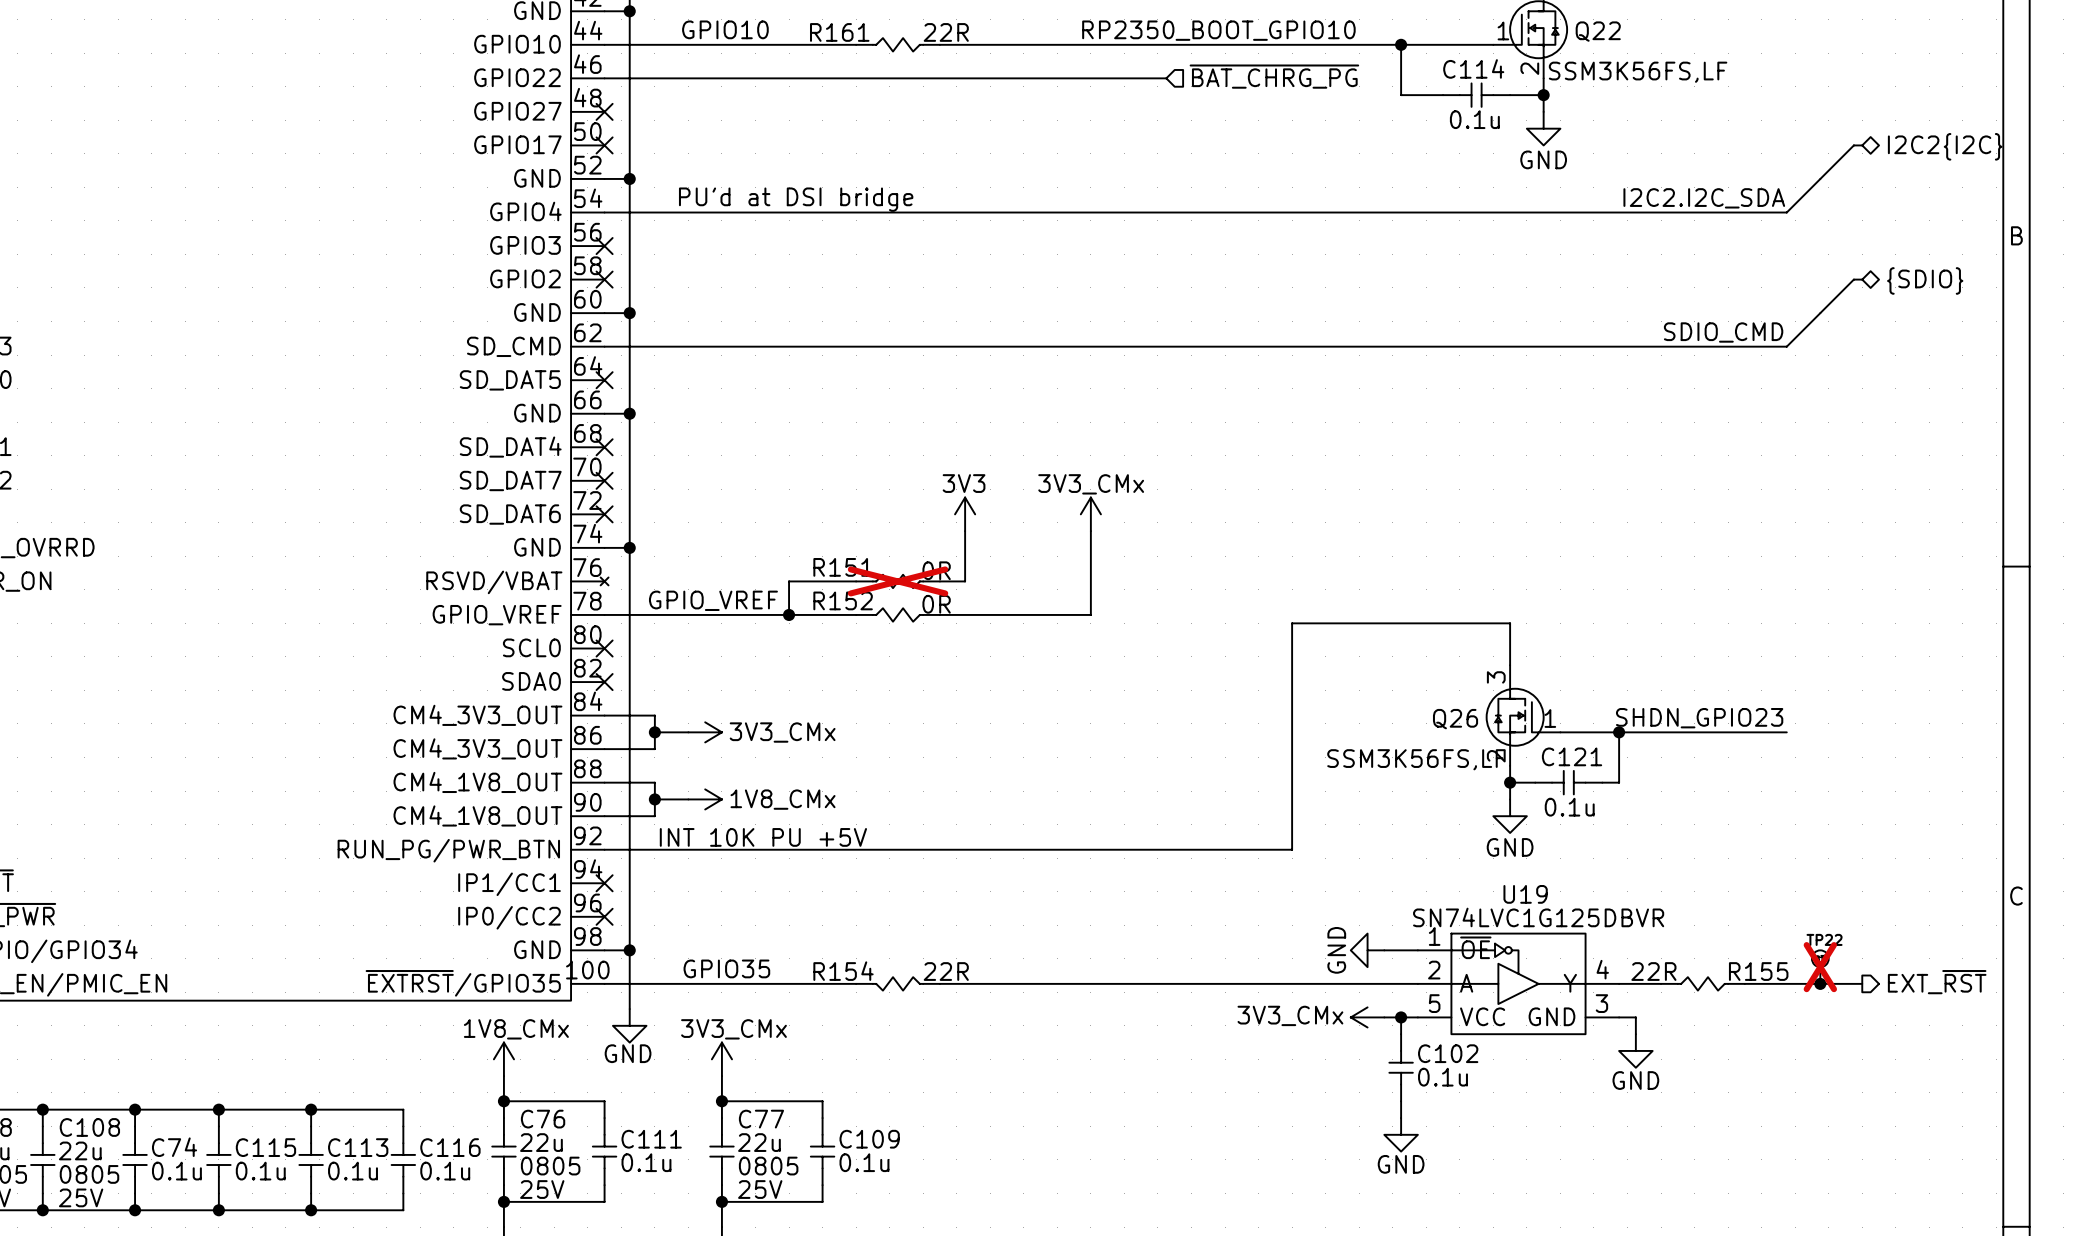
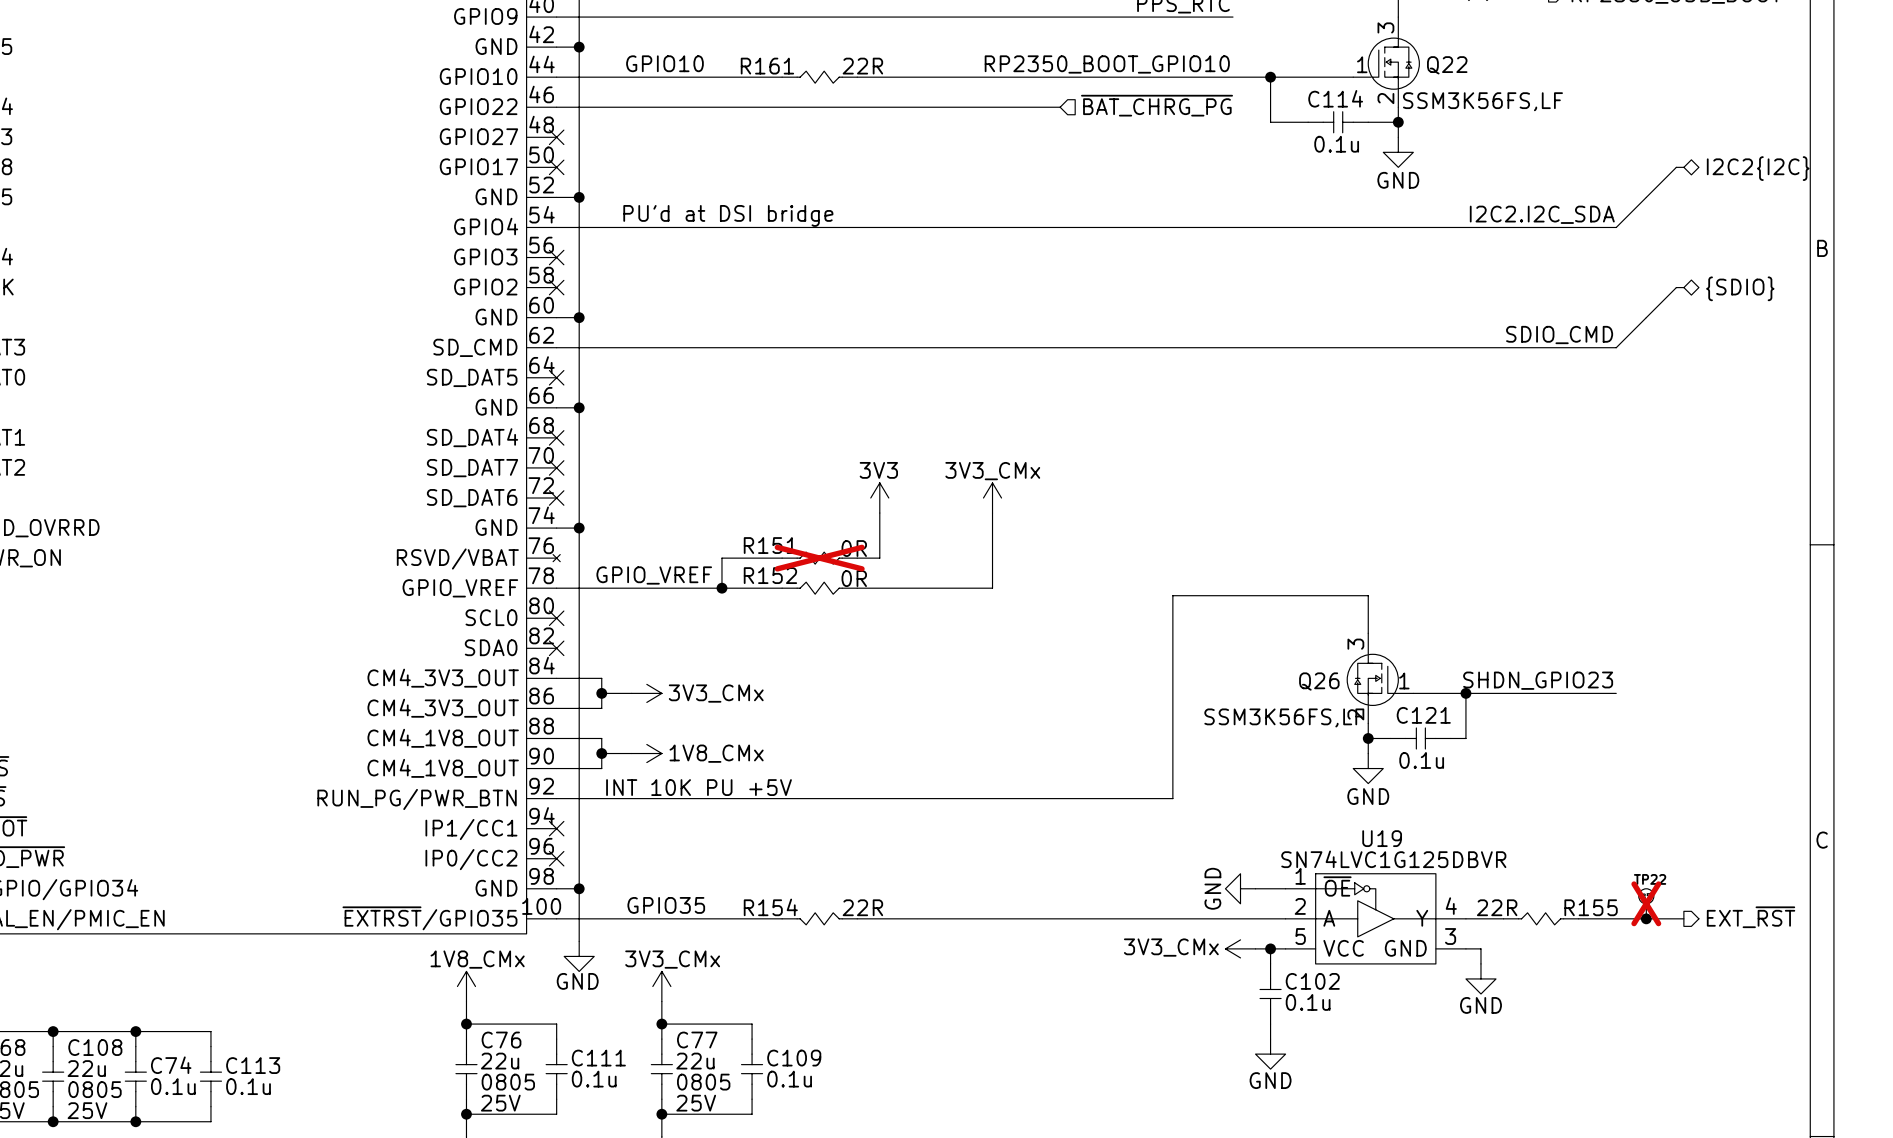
wire: (218, 1109) (403, 1109) (403, 1126) -> none
junction: (218, 1109) -> none
wire: (311, 1109) (311, 1126) -> none
junction: (311, 1109) -> none
C115 name: C115 (265, 1147) -> C113 (253, 1065)
C113: 0.1u (311, 1159) -> none
C116: 0.1u (403, 1159) -> none
wire: (311, 1193) (311, 1210) -> none
wire: (403, 1193) (403, 1210) (218, 1210) -> none
junction: (218, 1210) -> none
junction: (311, 1210) -> none

